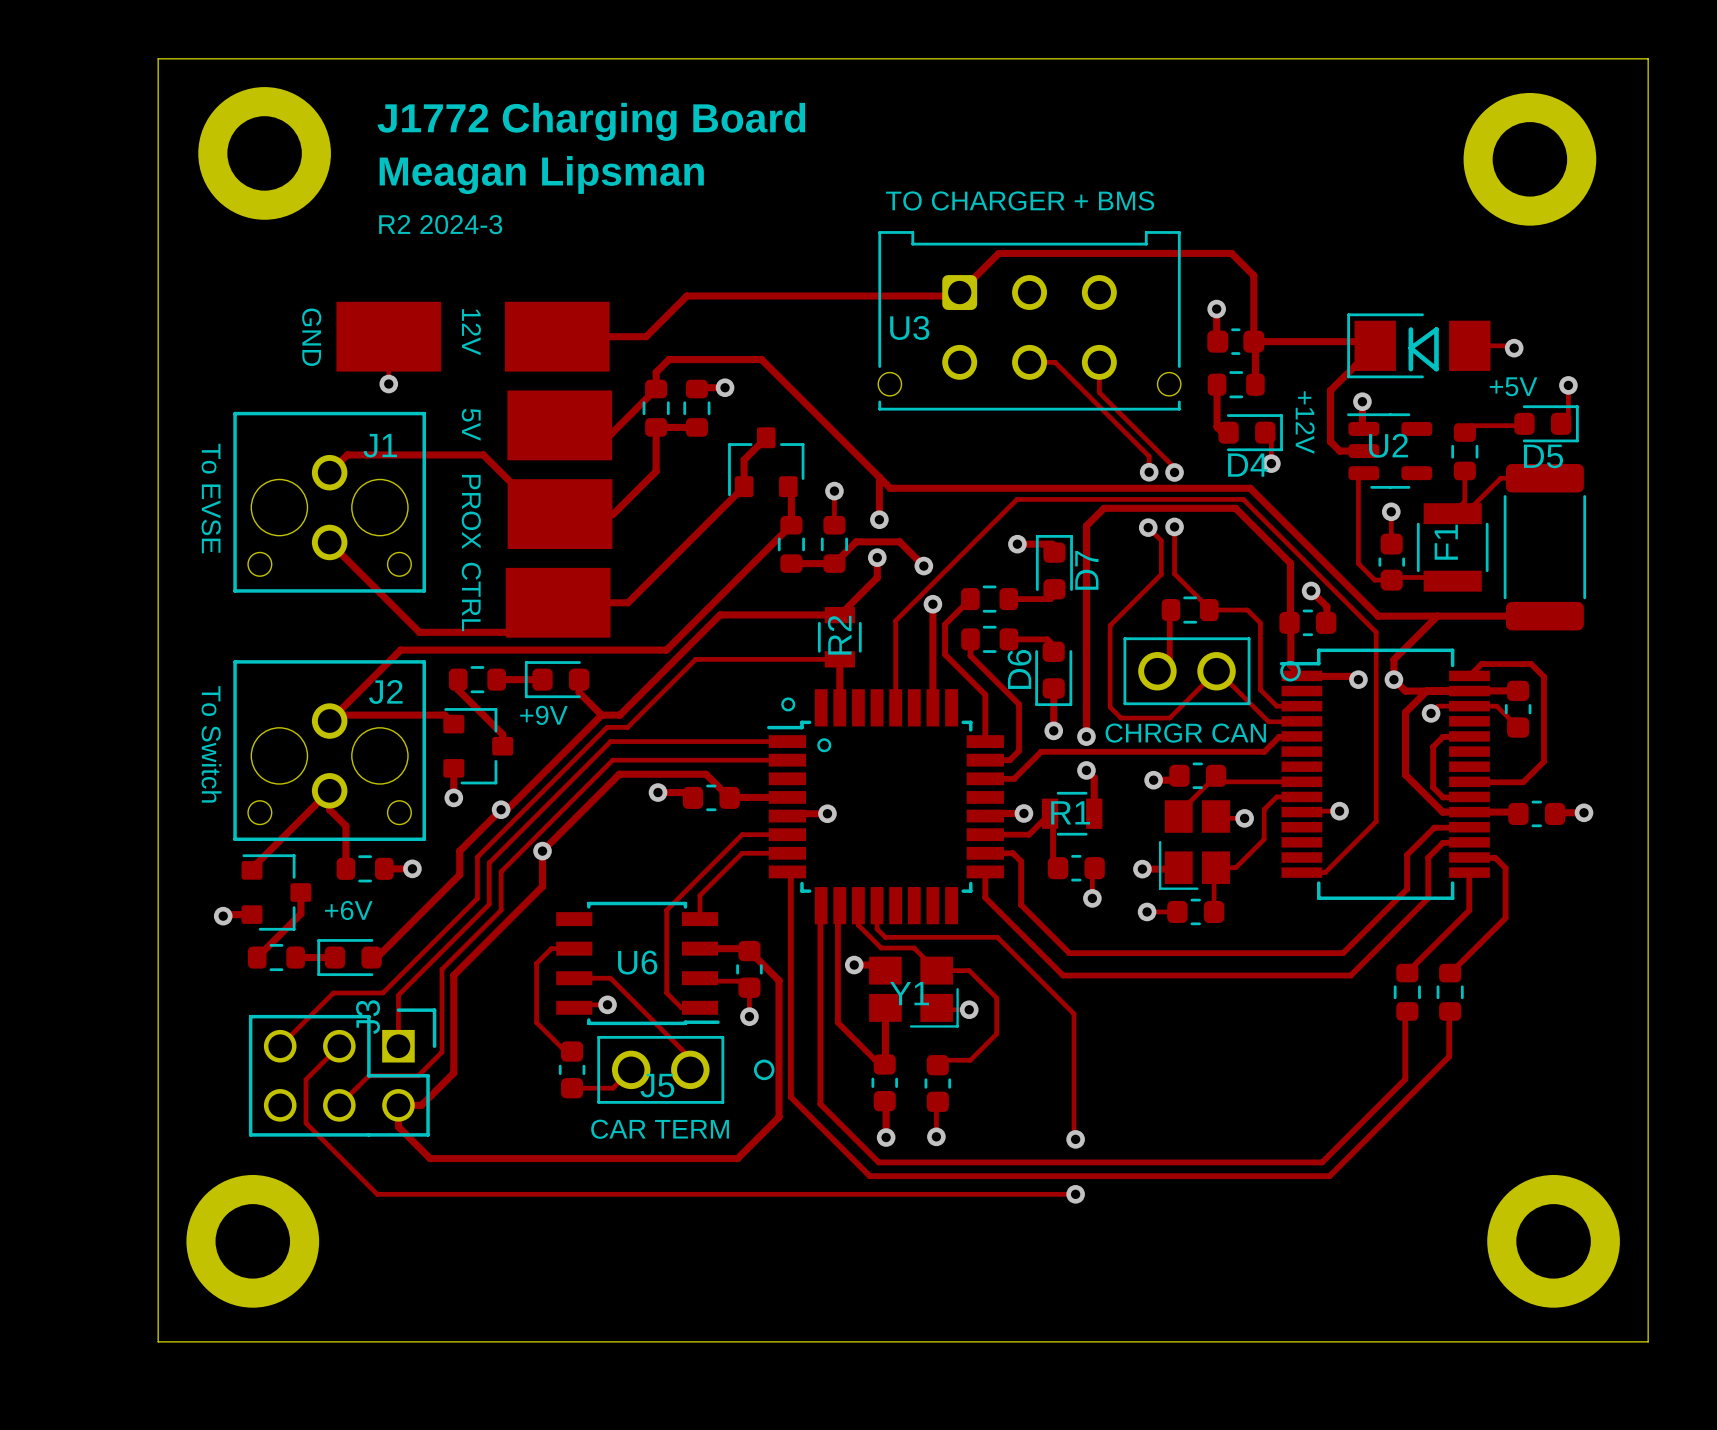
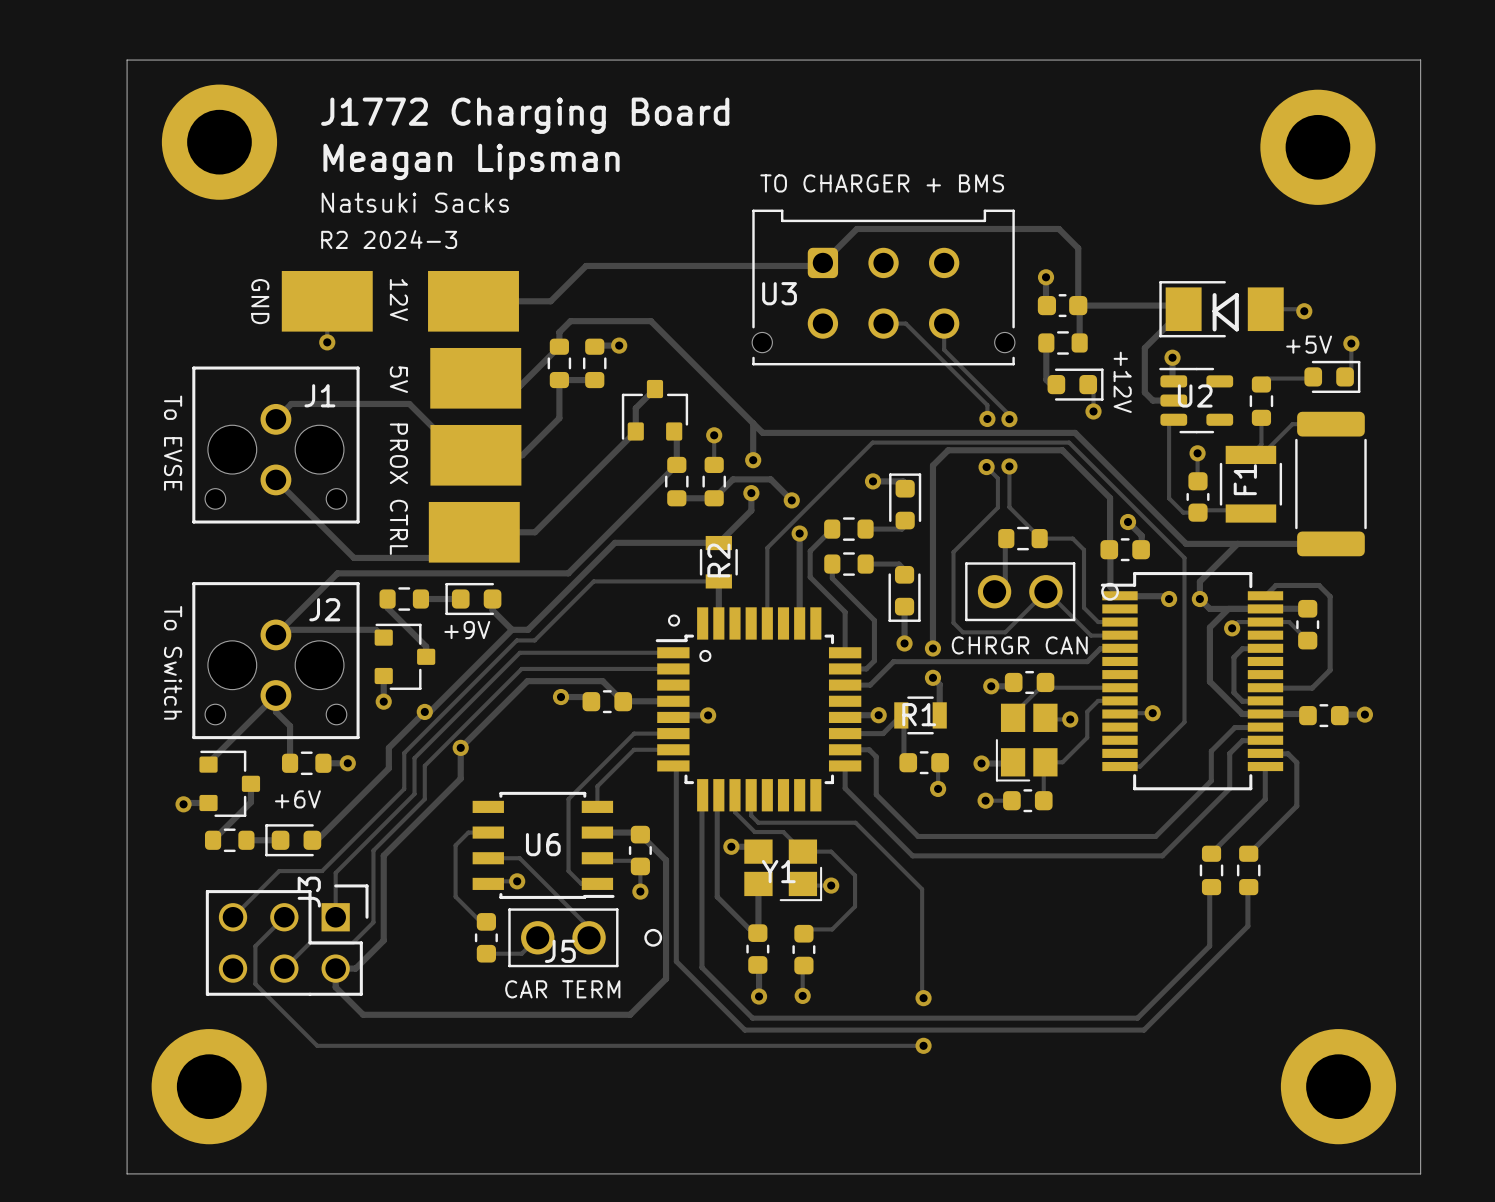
text: R2 2024-3 (440, 224) -> Natsuki Sacks (415, 202)
text: none -> R2 2024-3 (389, 239)
D5 name: D5 (1543, 456) -> none
D4 name: D4 (1247, 465) -> none
D7 name: D7 (1086, 570) -> none
D6 name: D6 (1019, 669) -> none

